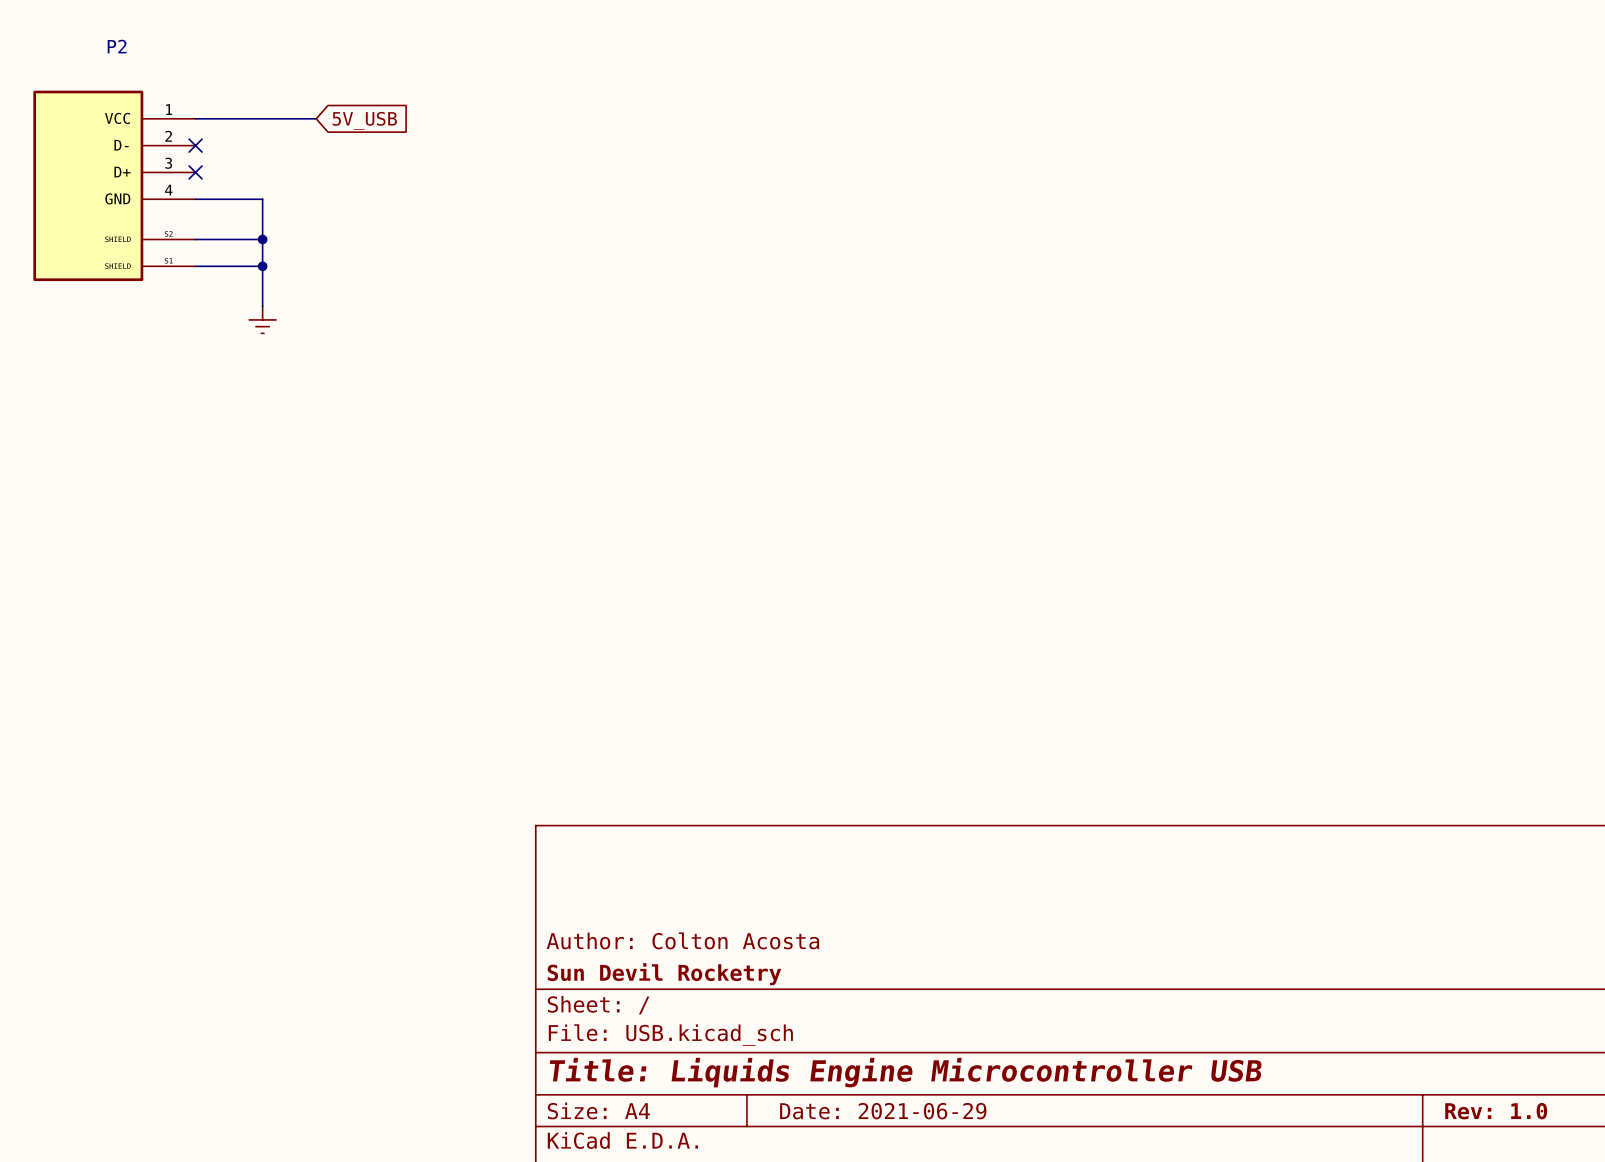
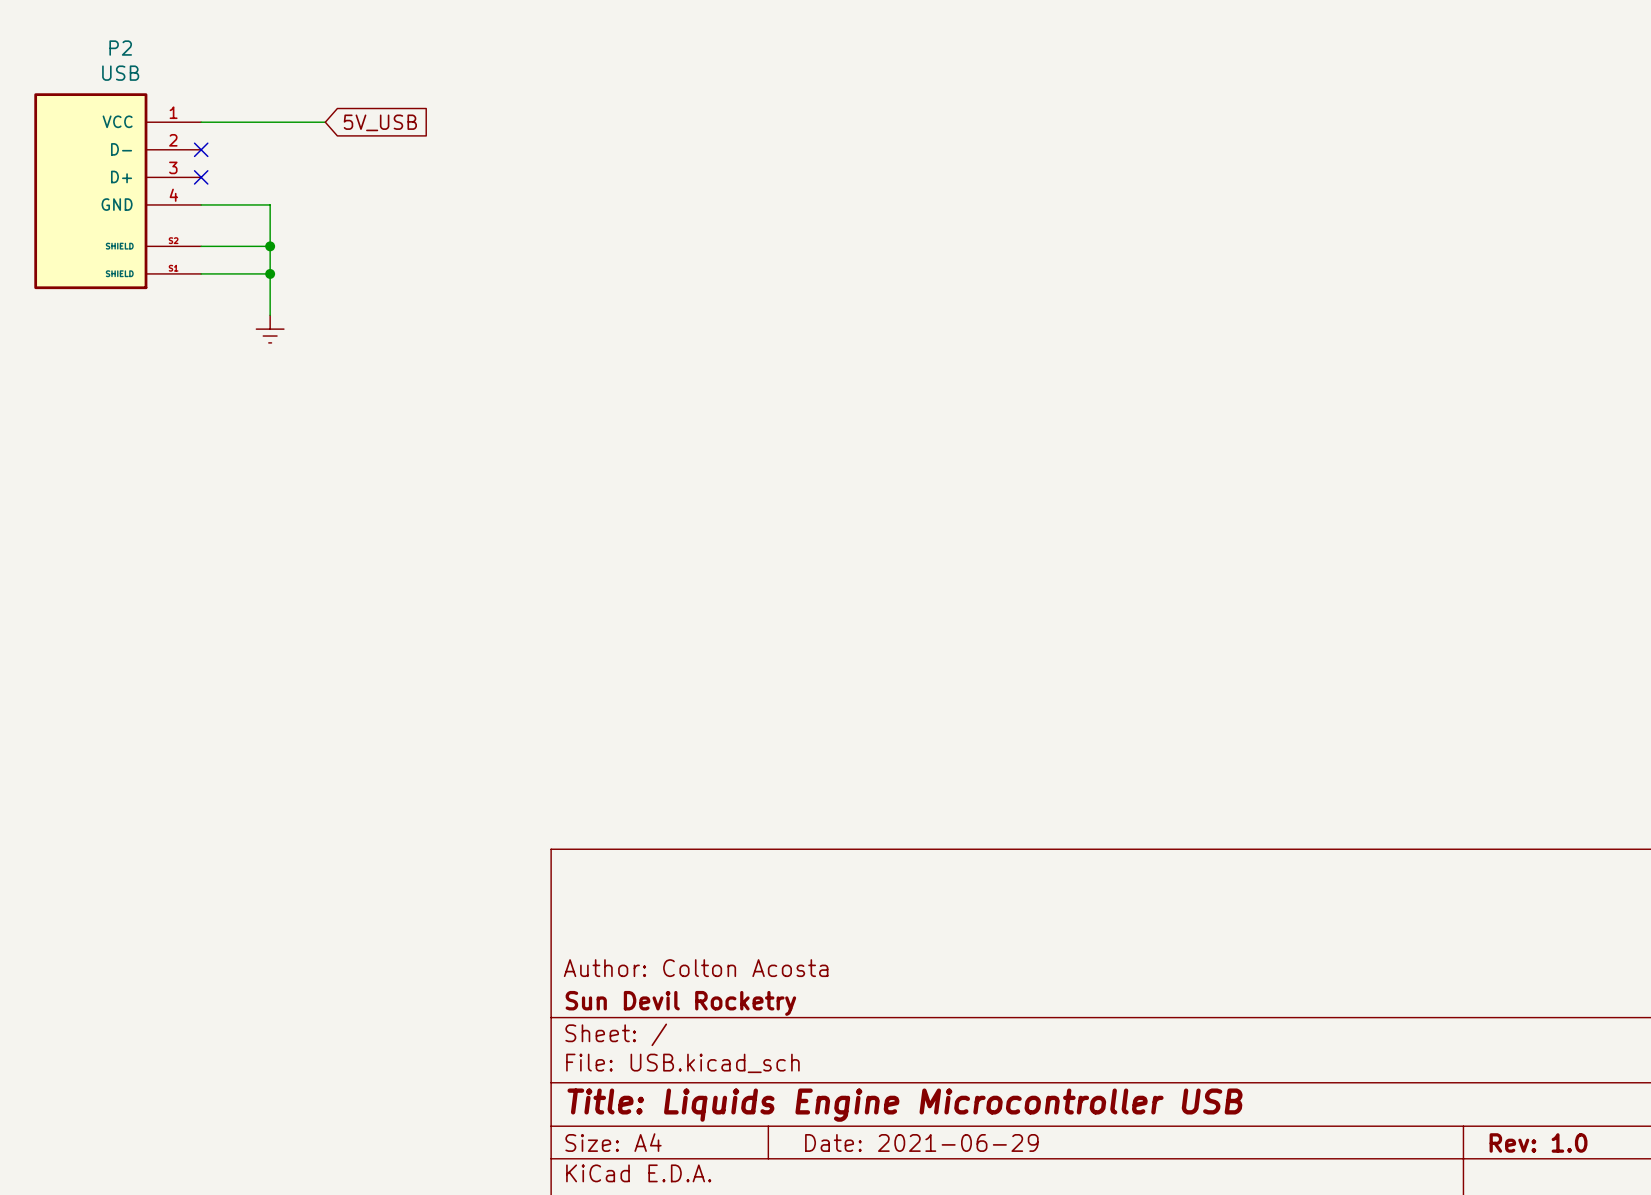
P2 value: none -> USB (120, 73)

